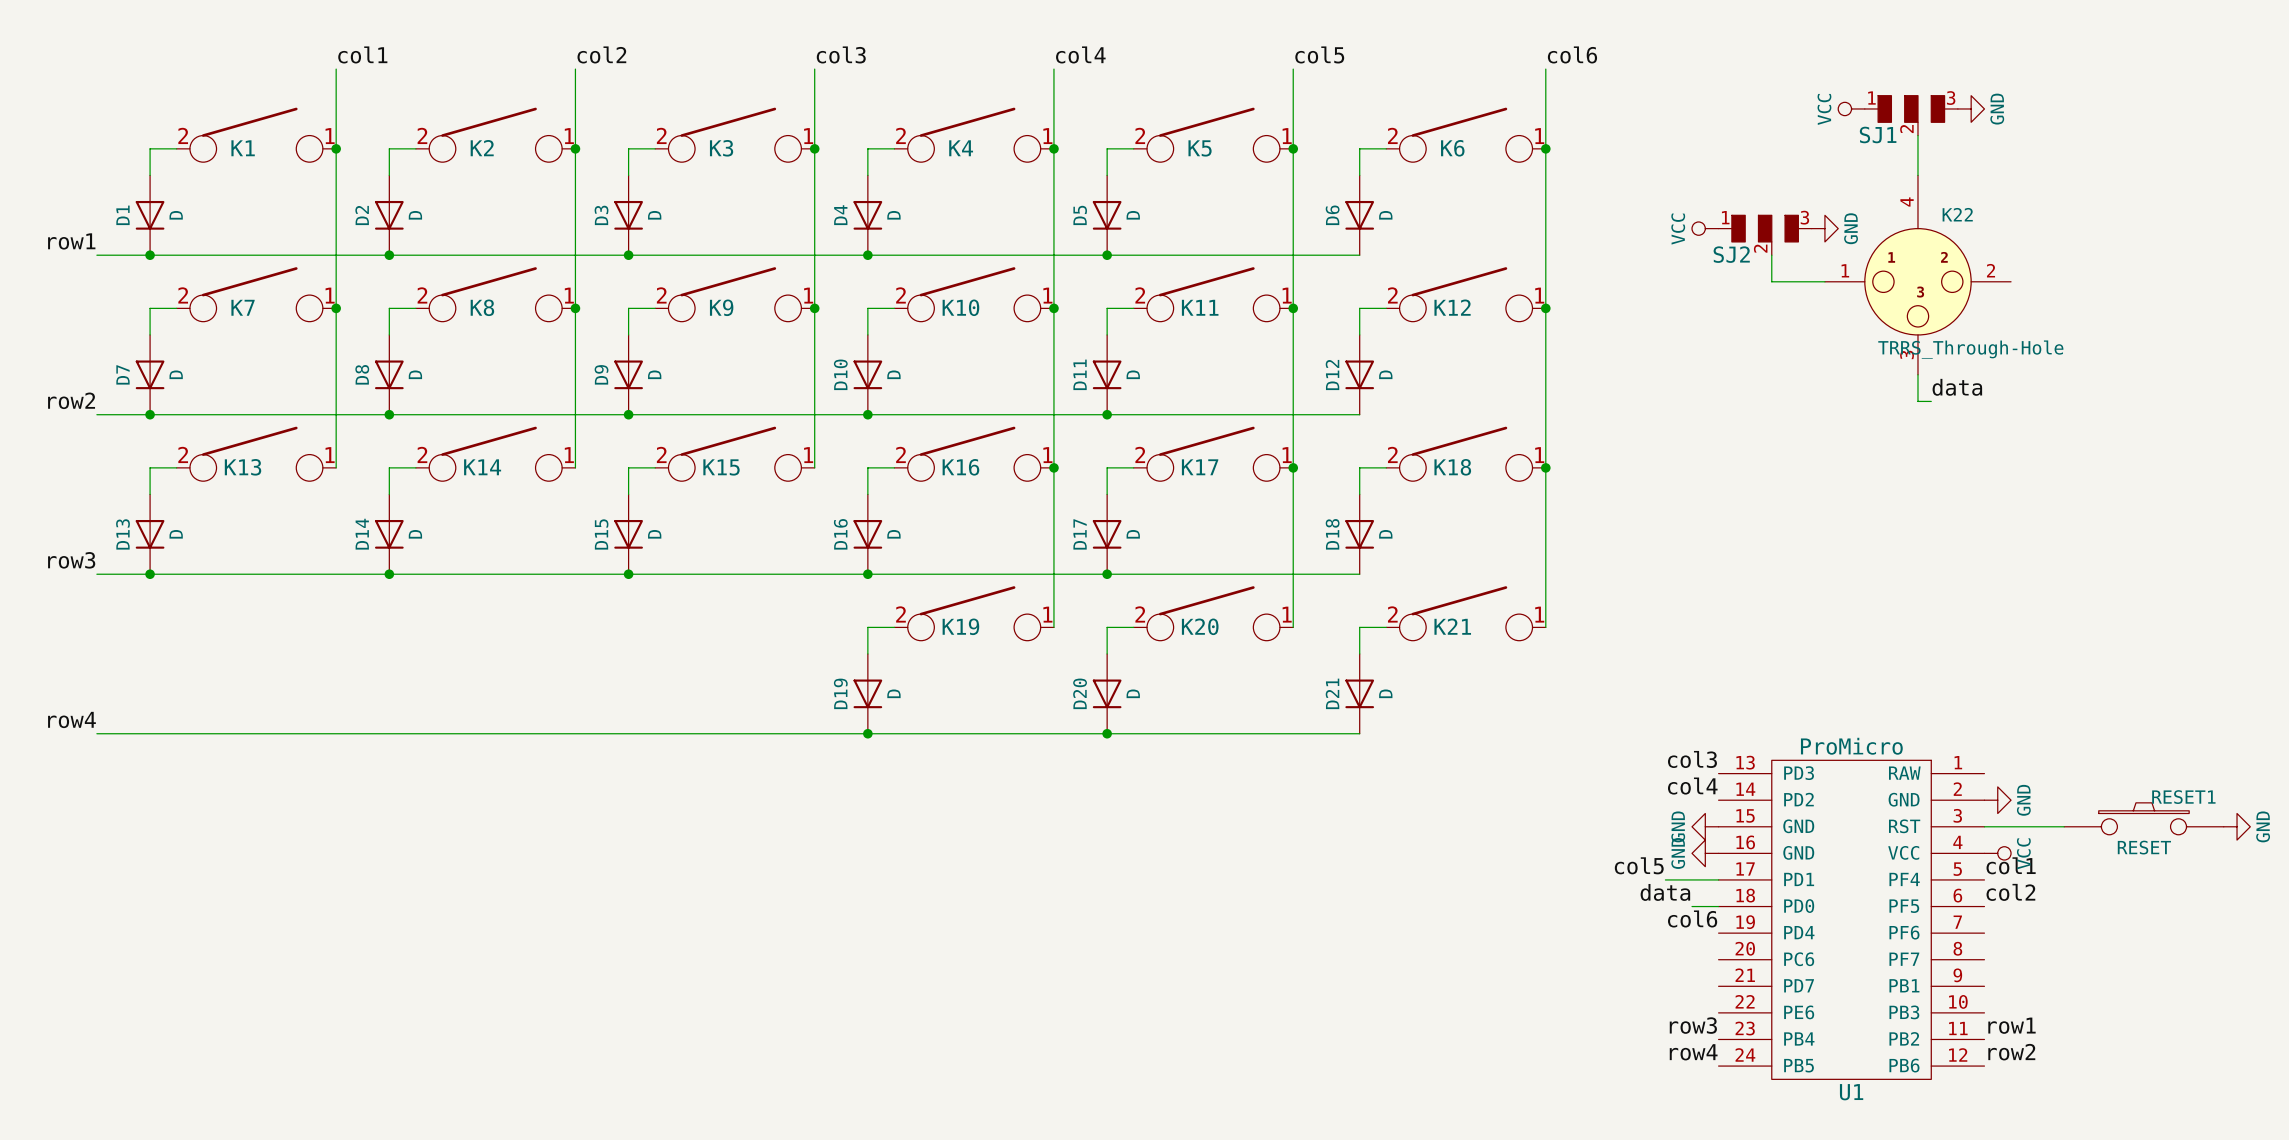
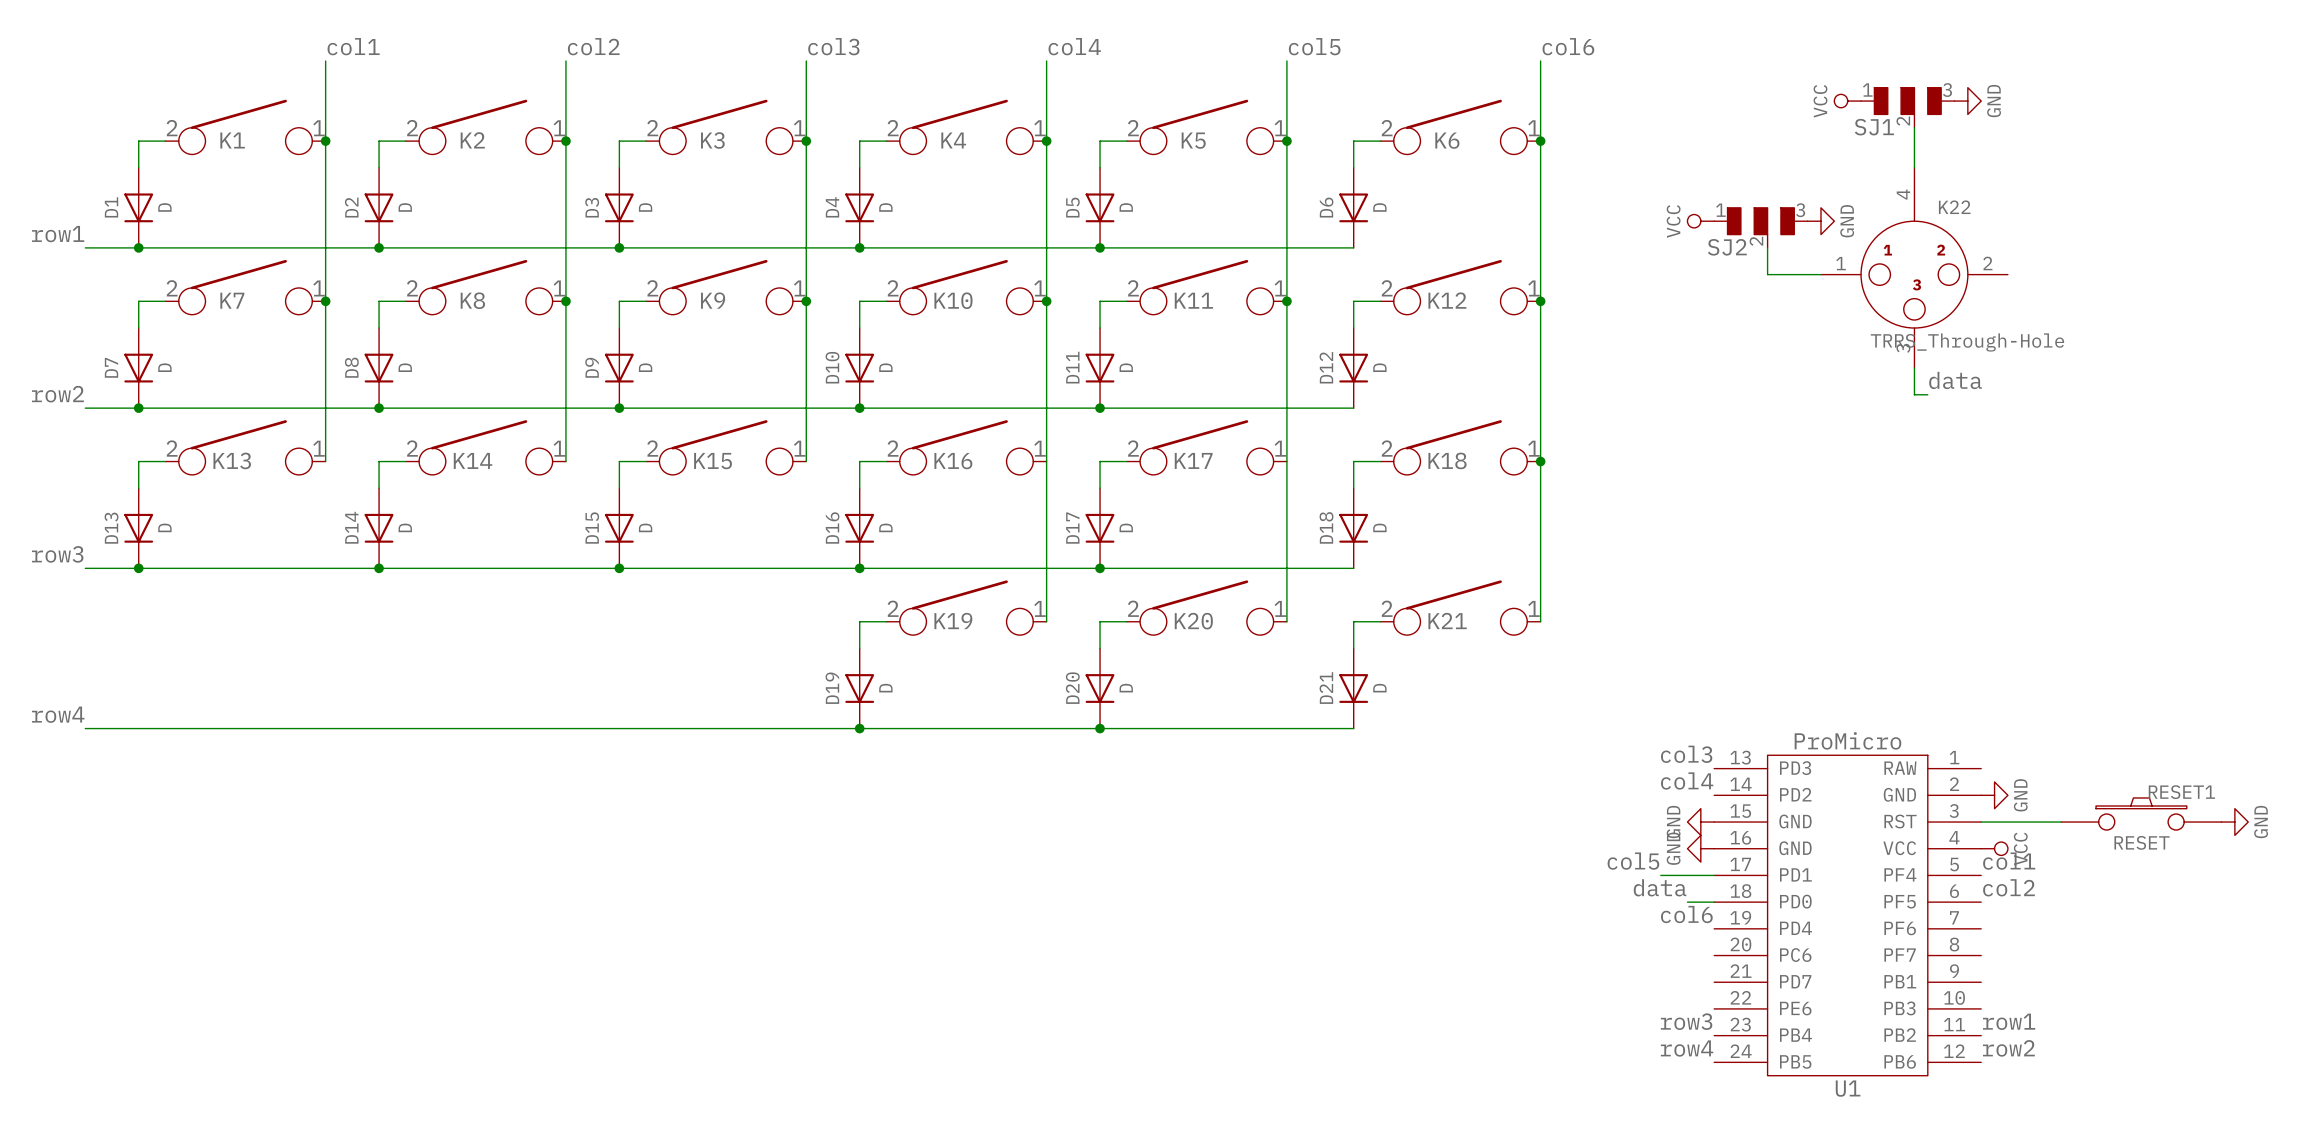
junction: (1053, 467) -> none
junction: (1293, 467) -> none

